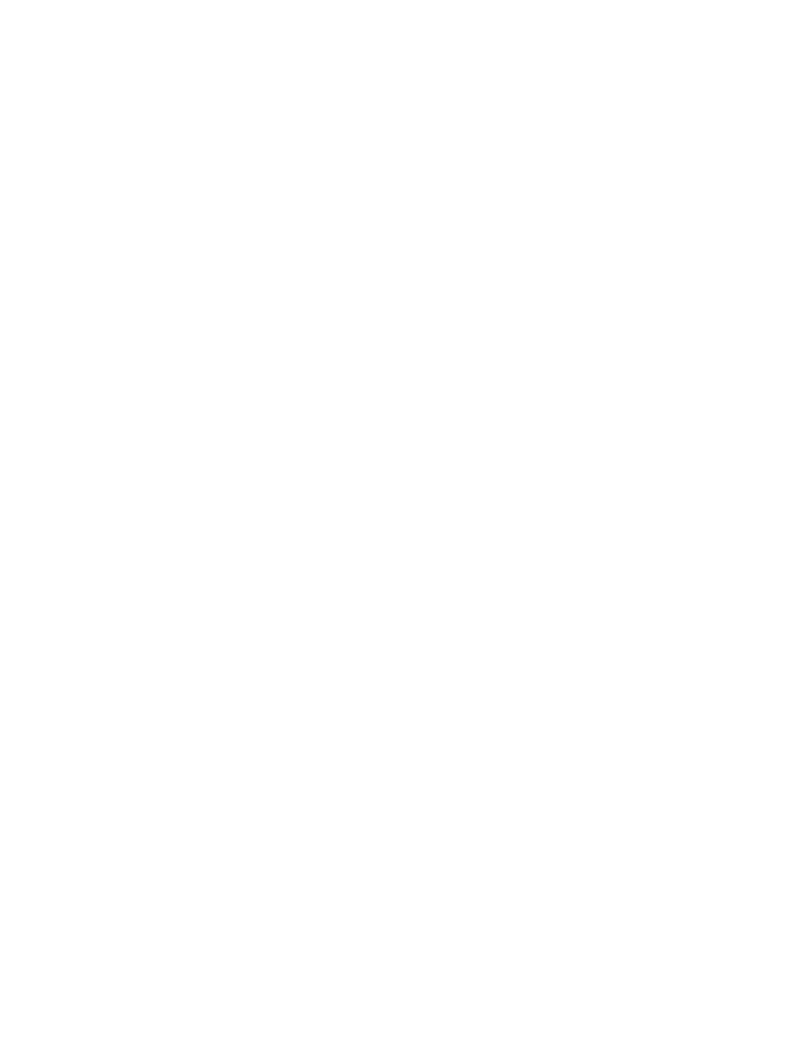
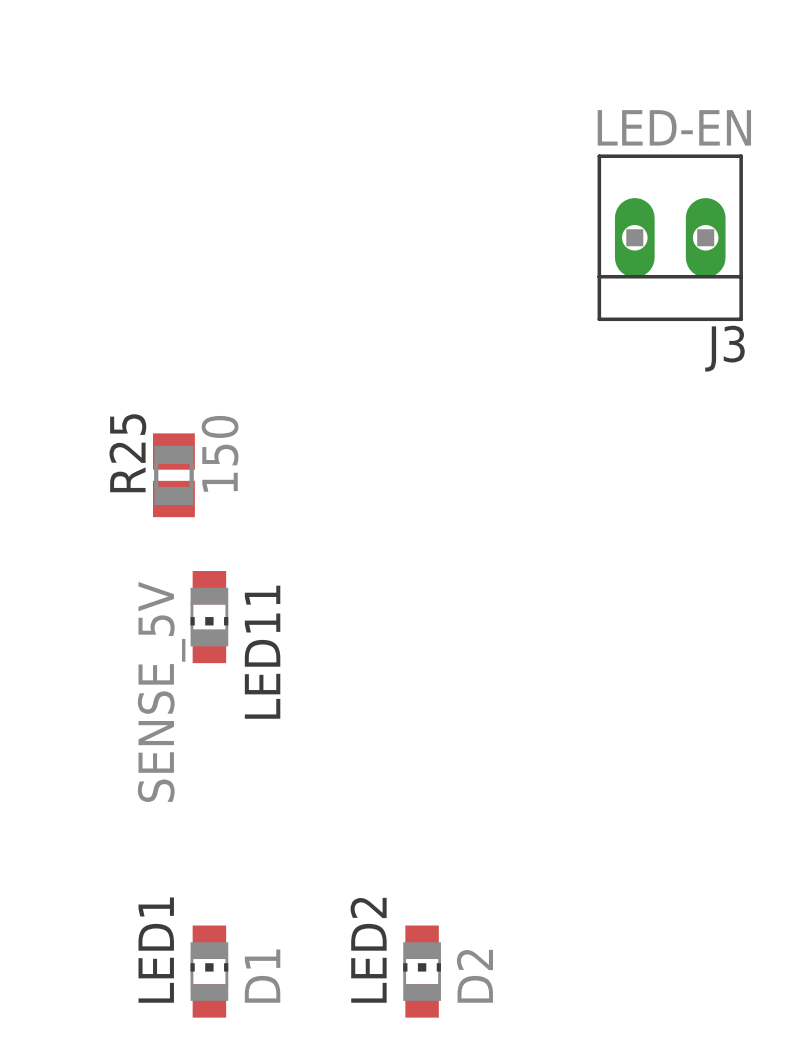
J3: none -> LED-EN (670, 237)
R25: none -> 150 (173, 475)
LED11: none -> SENSE_5V (209, 617)
LED1: none -> D1 (209, 971)
LED2: none -> D2 (422, 971)

